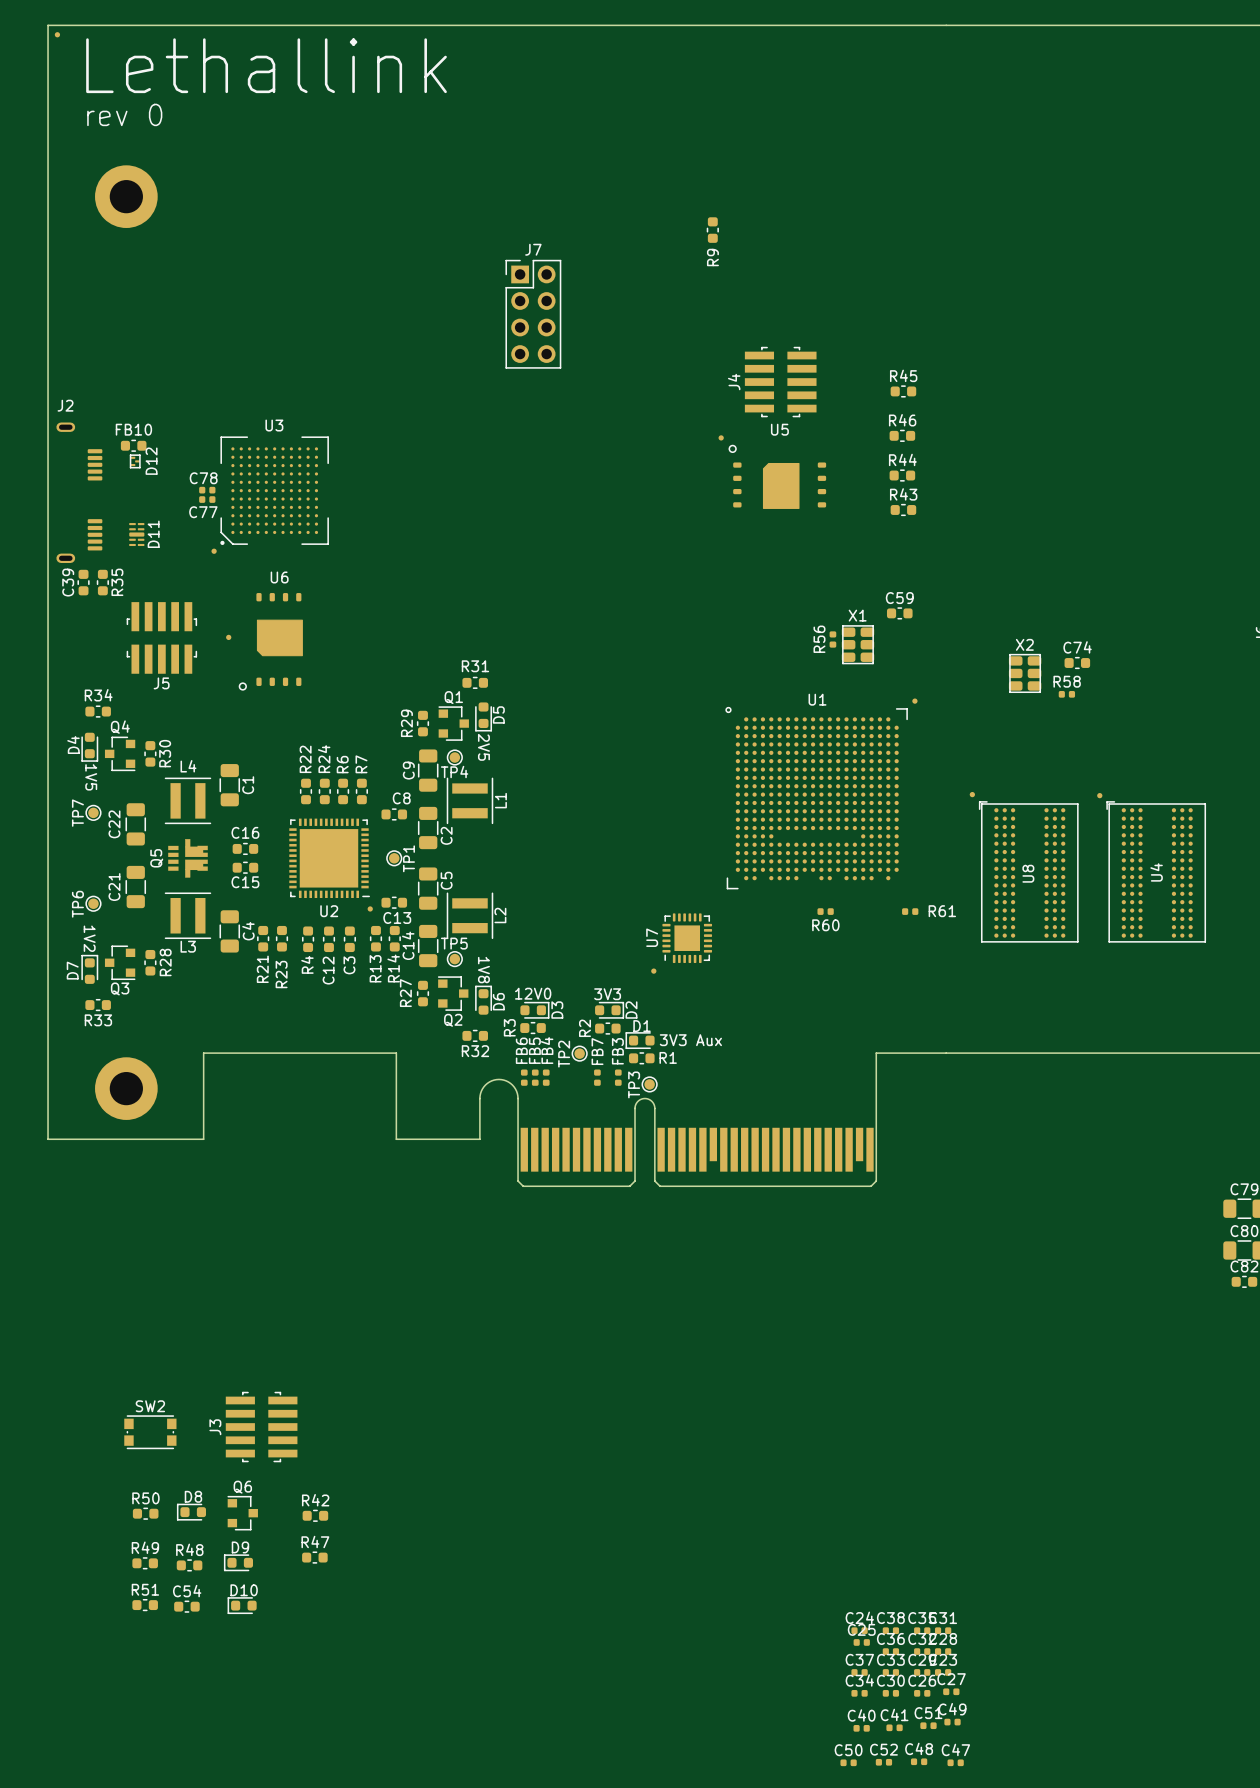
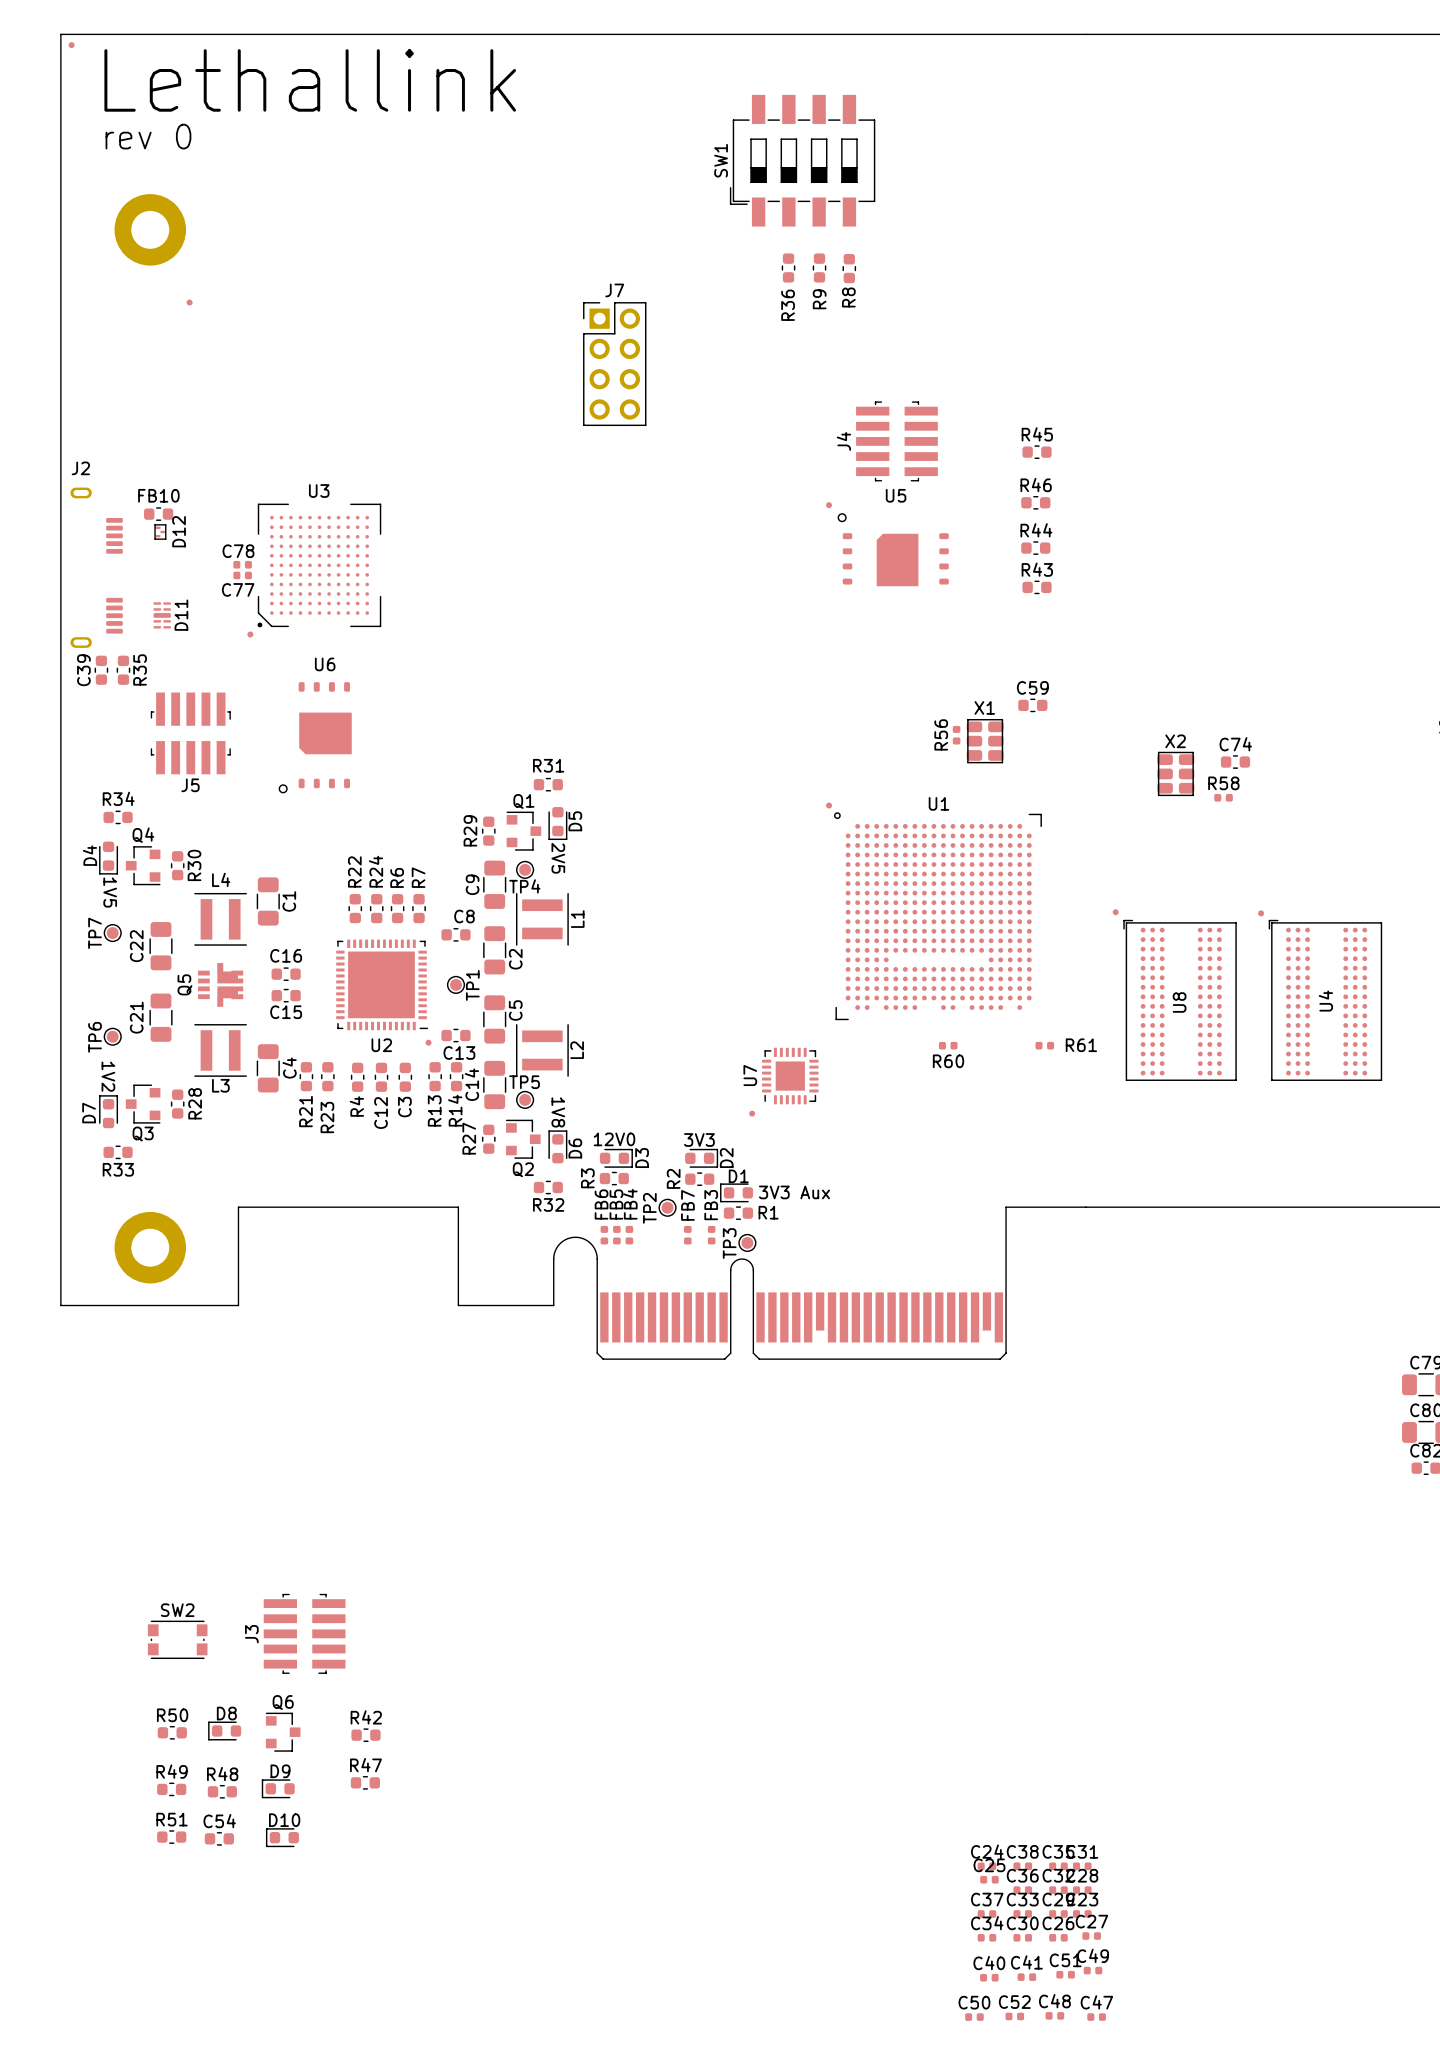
SW1: none -> (802, 160)
R36: none -> (788, 267)
R8: none -> (849, 268)
part: none -> (189, 302)
part: (228, 637) -> none
part position: (914, 701) -> (829, 805)

